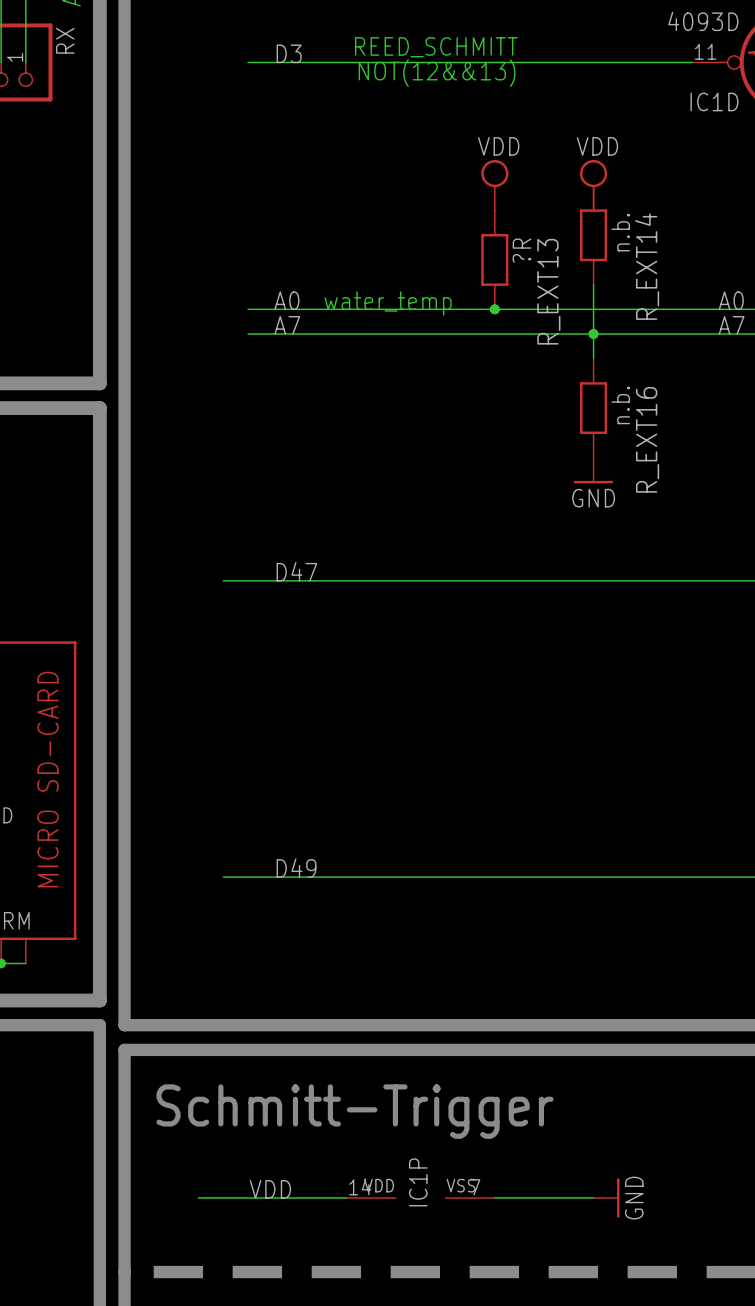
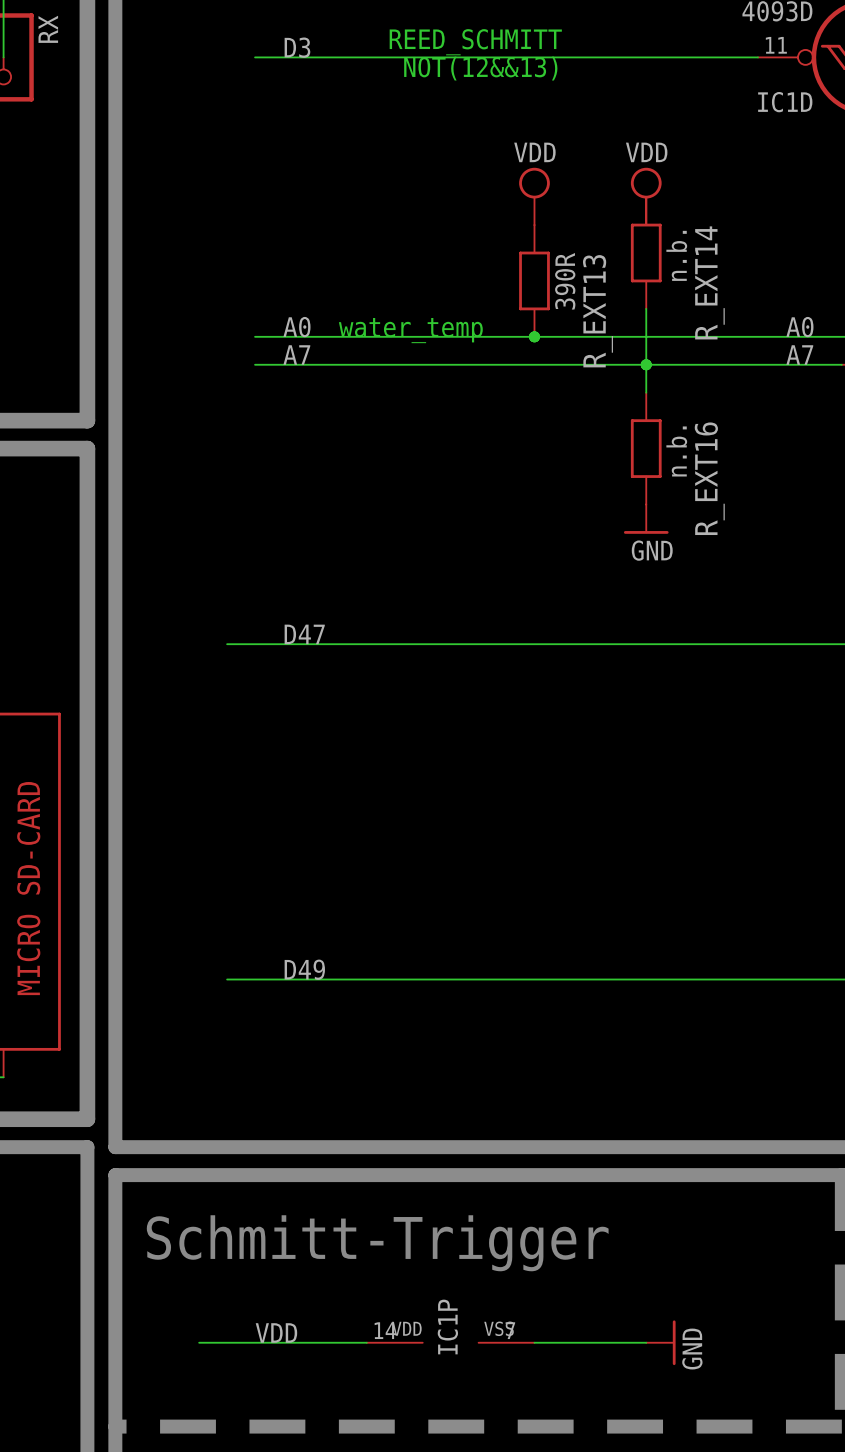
R_EXT13 value: ?R (521, 250) -> 390R (565, 281)

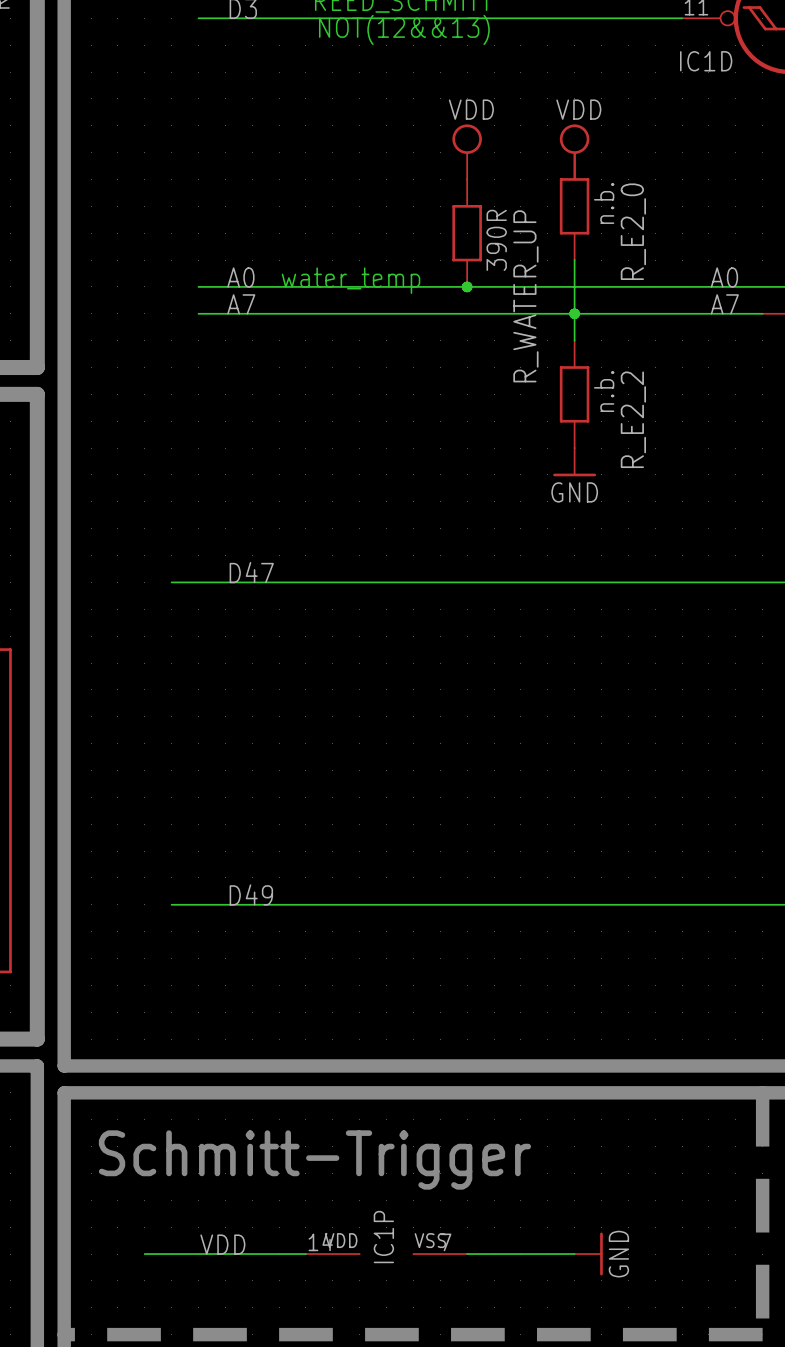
R_EXT14 name: R_EXT14 (709, 282) -> R_E2_0 (633, 231)
R_EXT13 name: R_EXT13 (597, 311) -> R_WATER_UP (525, 296)
R_EXT16 name: R_EXT16 (709, 478) -> R_E2_2 (633, 419)

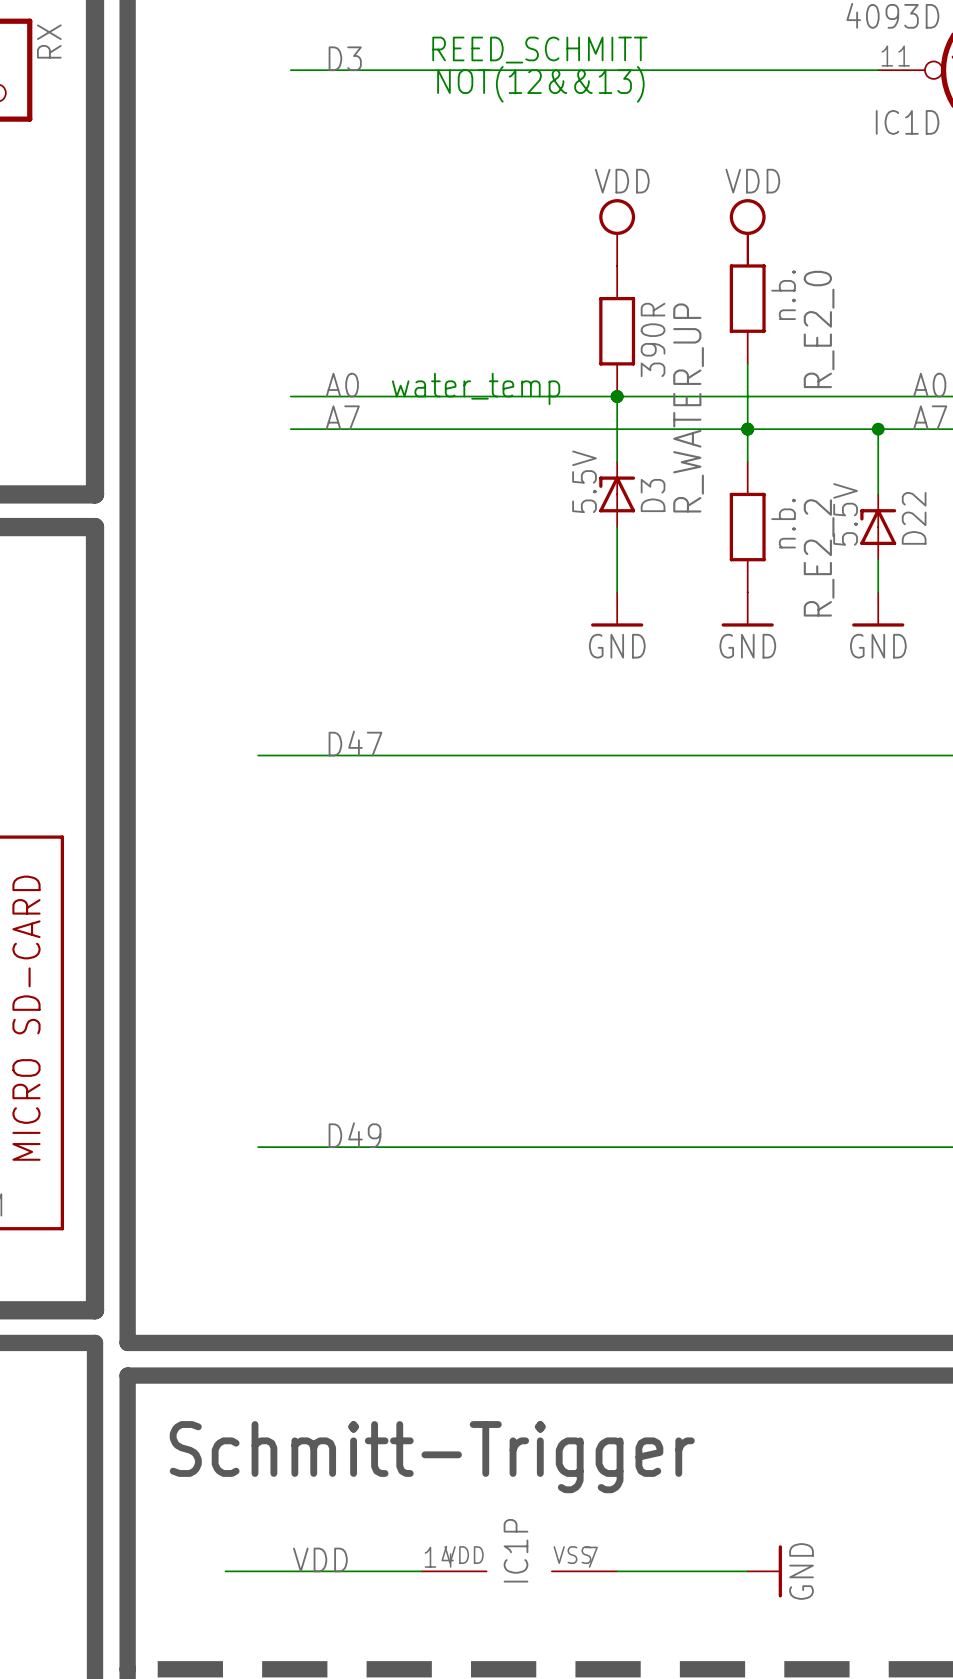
wire: none -> (617, 396) (617, 461)
wire: none -> (878, 429) (878, 494)
junction: none -> (878, 429)
D3: none -> 5.5V (617, 494)
wire: none -> (617, 527) (617, 592)
D22: none -> 5.5V (878, 527)
wire: none -> (878, 559) (878, 592)
power symbol: none -> GND (617, 609)
power symbol: none -> GND (878, 609)

